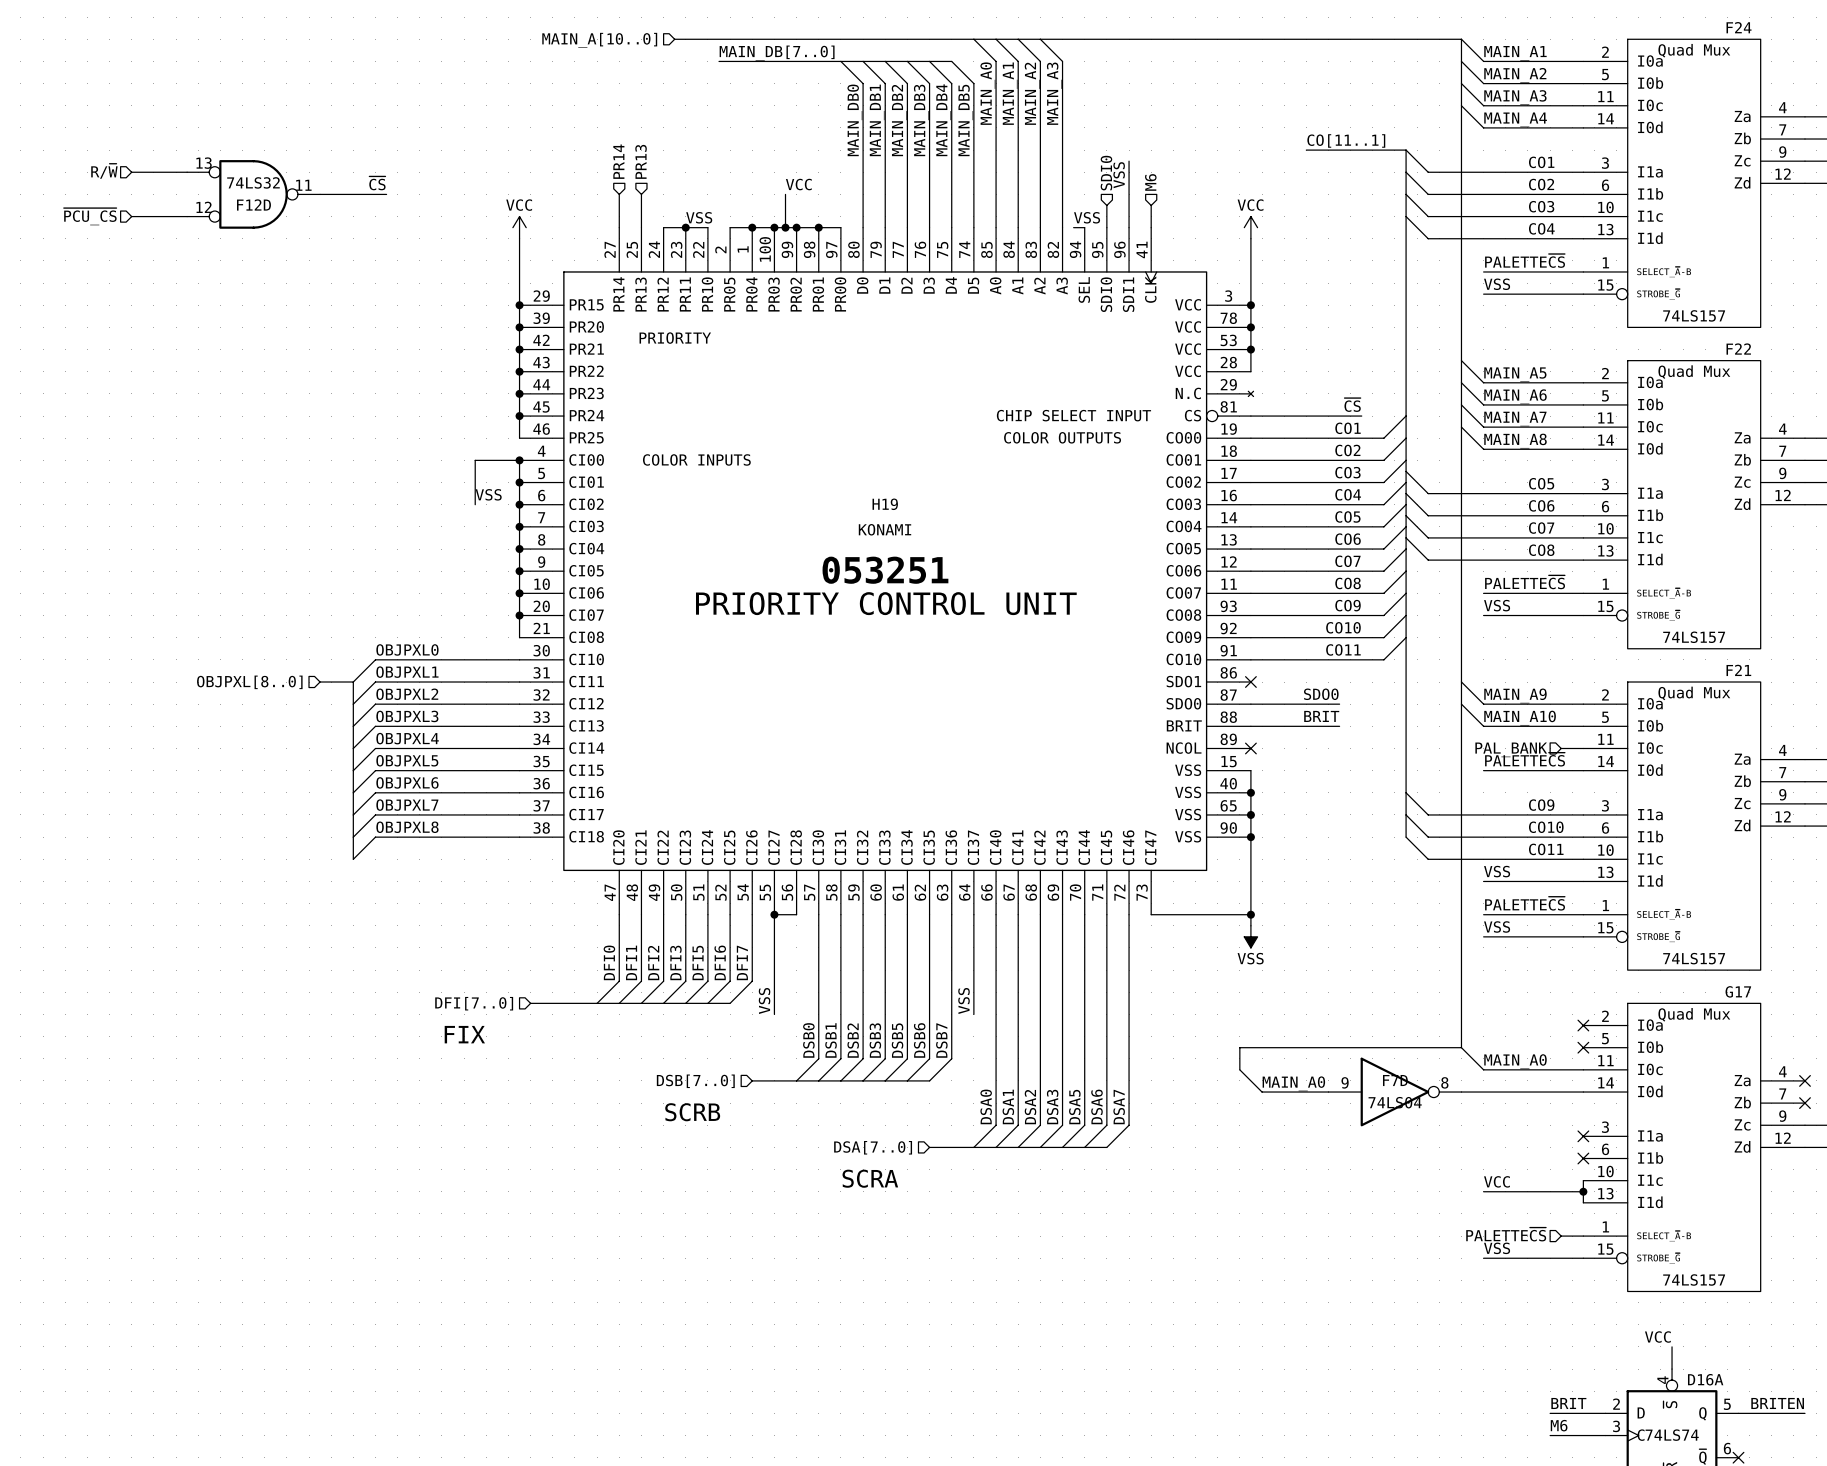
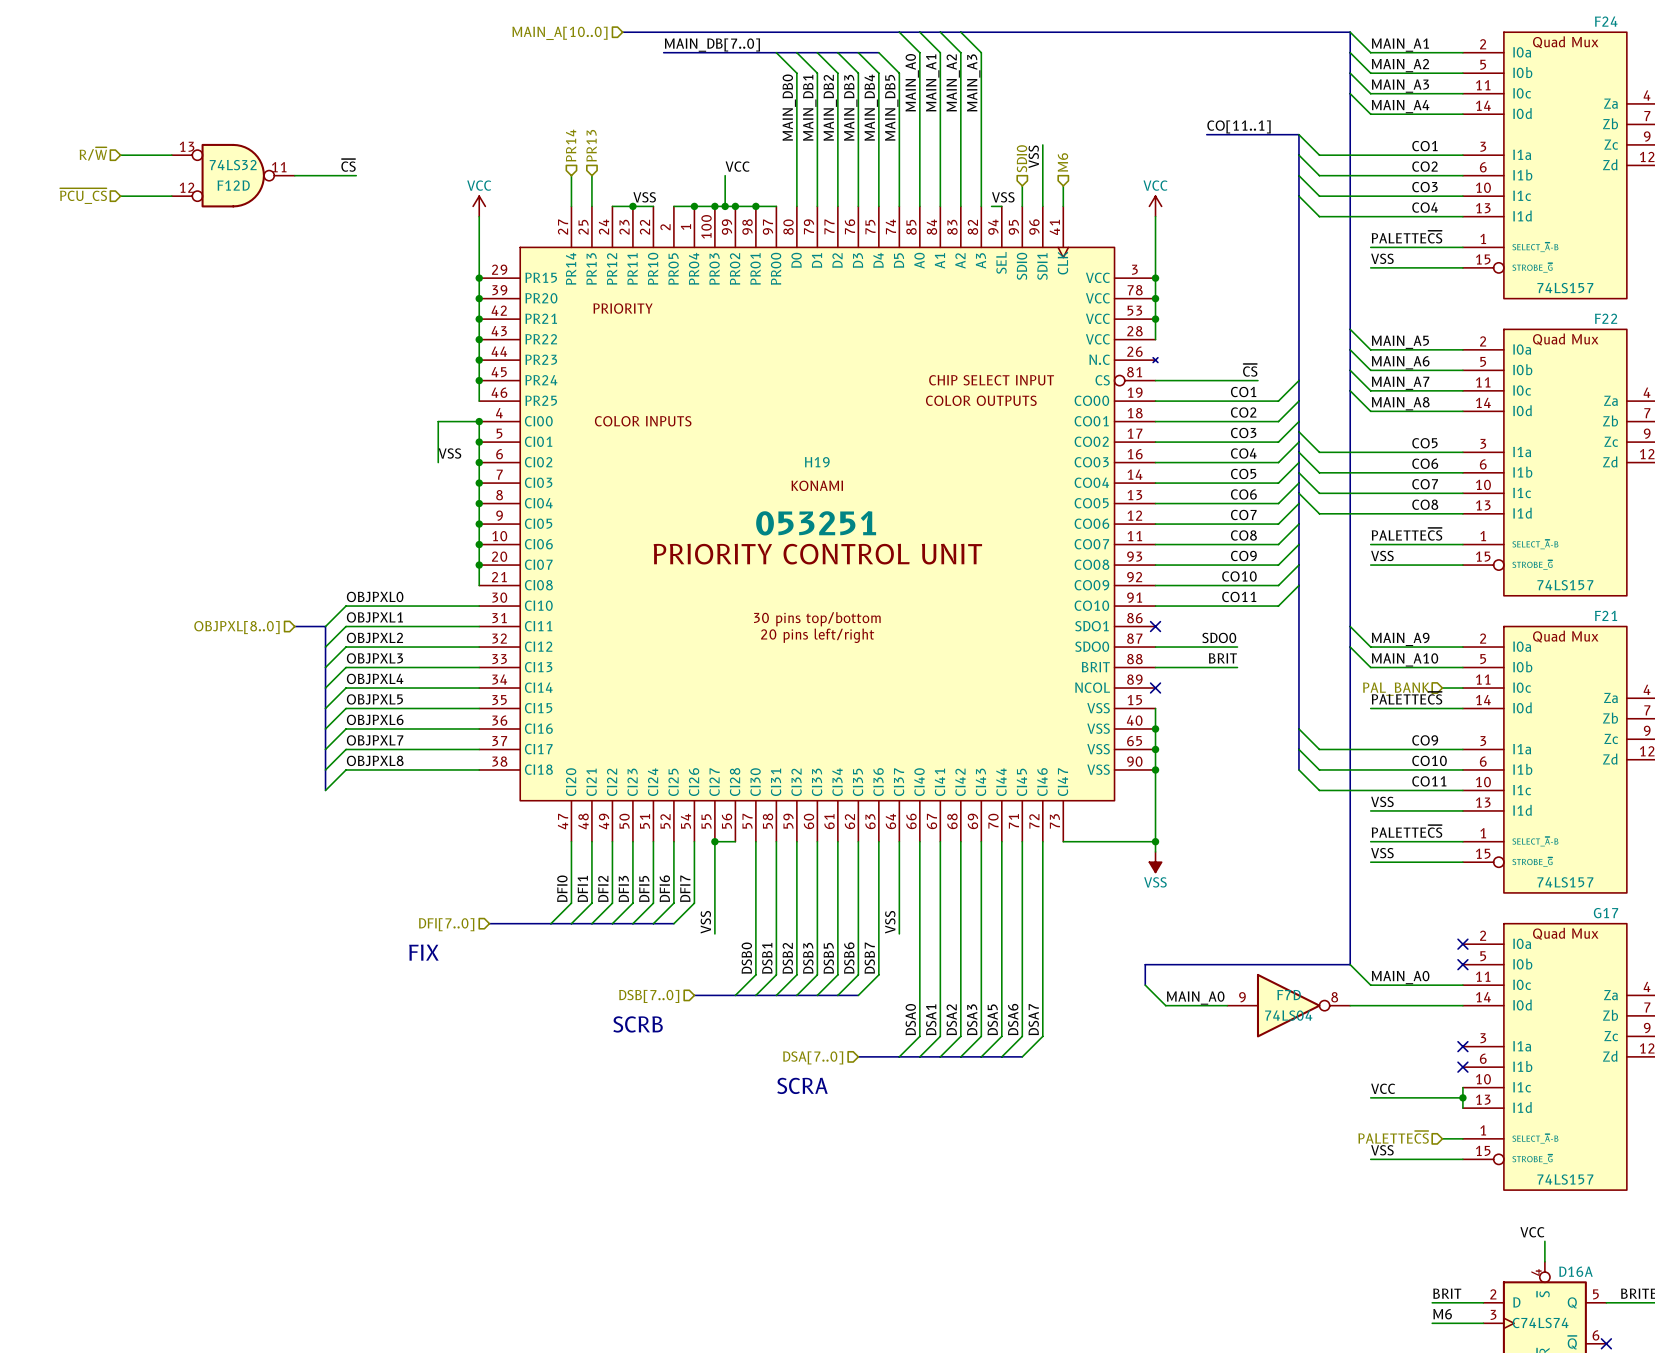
H19 pin number: 29 (1228, 384) -> 26 (1134, 351)
H19 text: none -> 30 pins top/bottom (817, 619)
H19 text: none -> 20 pins left/right (817, 635)

